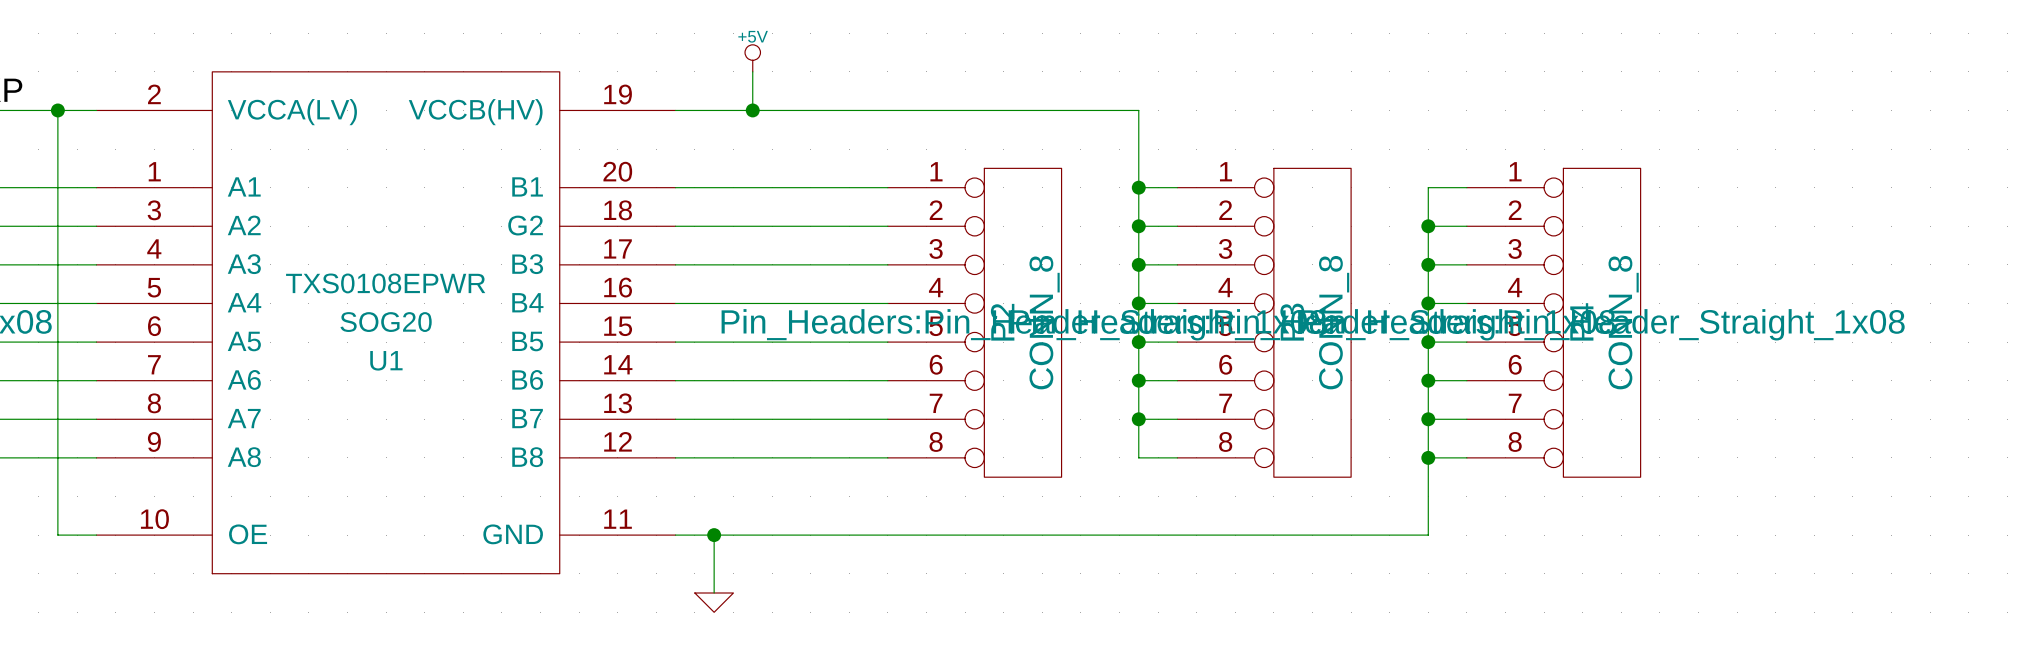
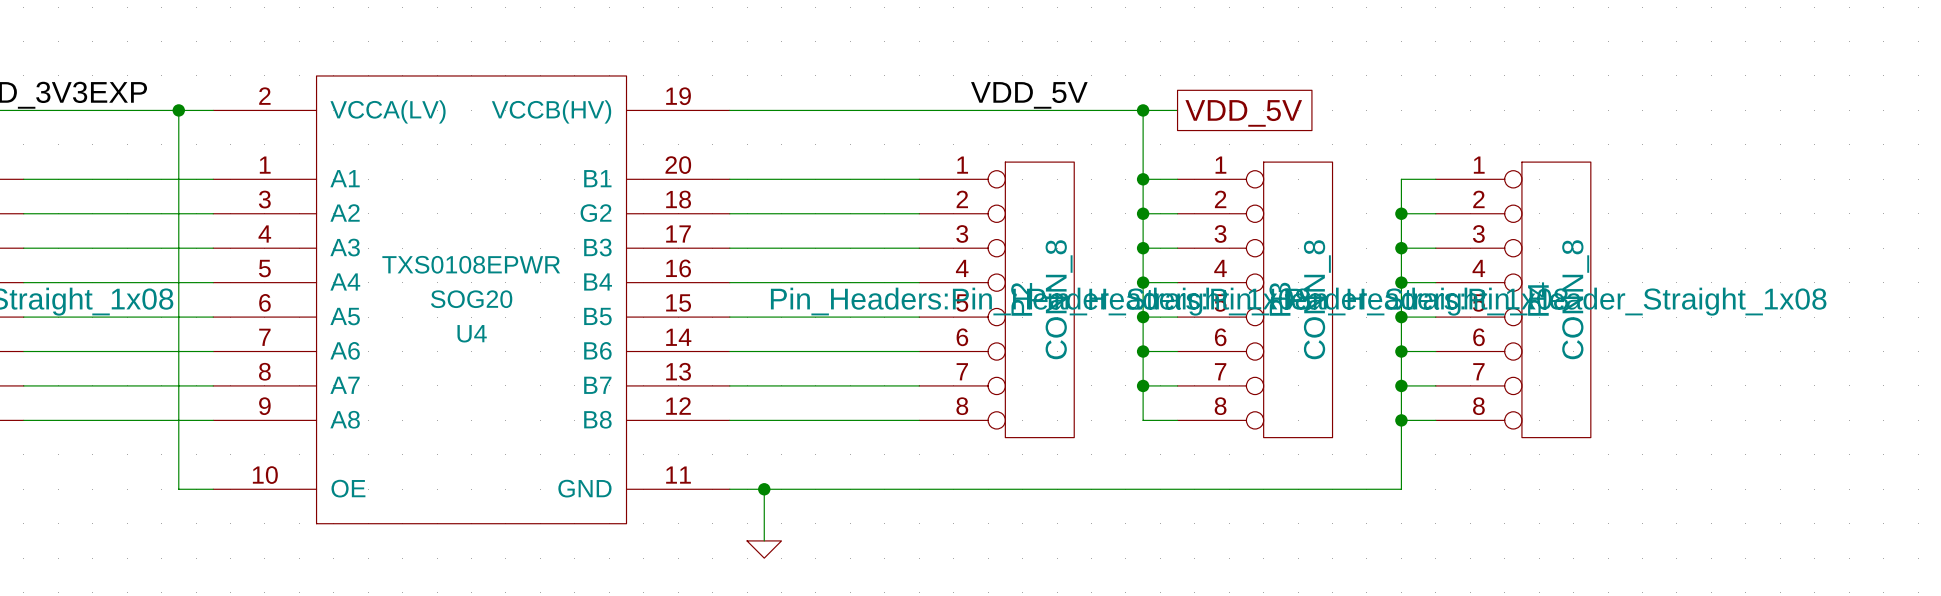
power symbol: +5V (752, 58) -> none
wire: (752, 71) (752, 110) -> none
label: none -> VDD_5V (1029, 95)
junction: (752, 110) -> none
wire: none -> (1143, 110) (1177, 110)
junction: none -> (1143, 110)
global label: none -> VDD_5V (1243, 113)
U1 name: U1 (386, 360) -> U4 (472, 333)

